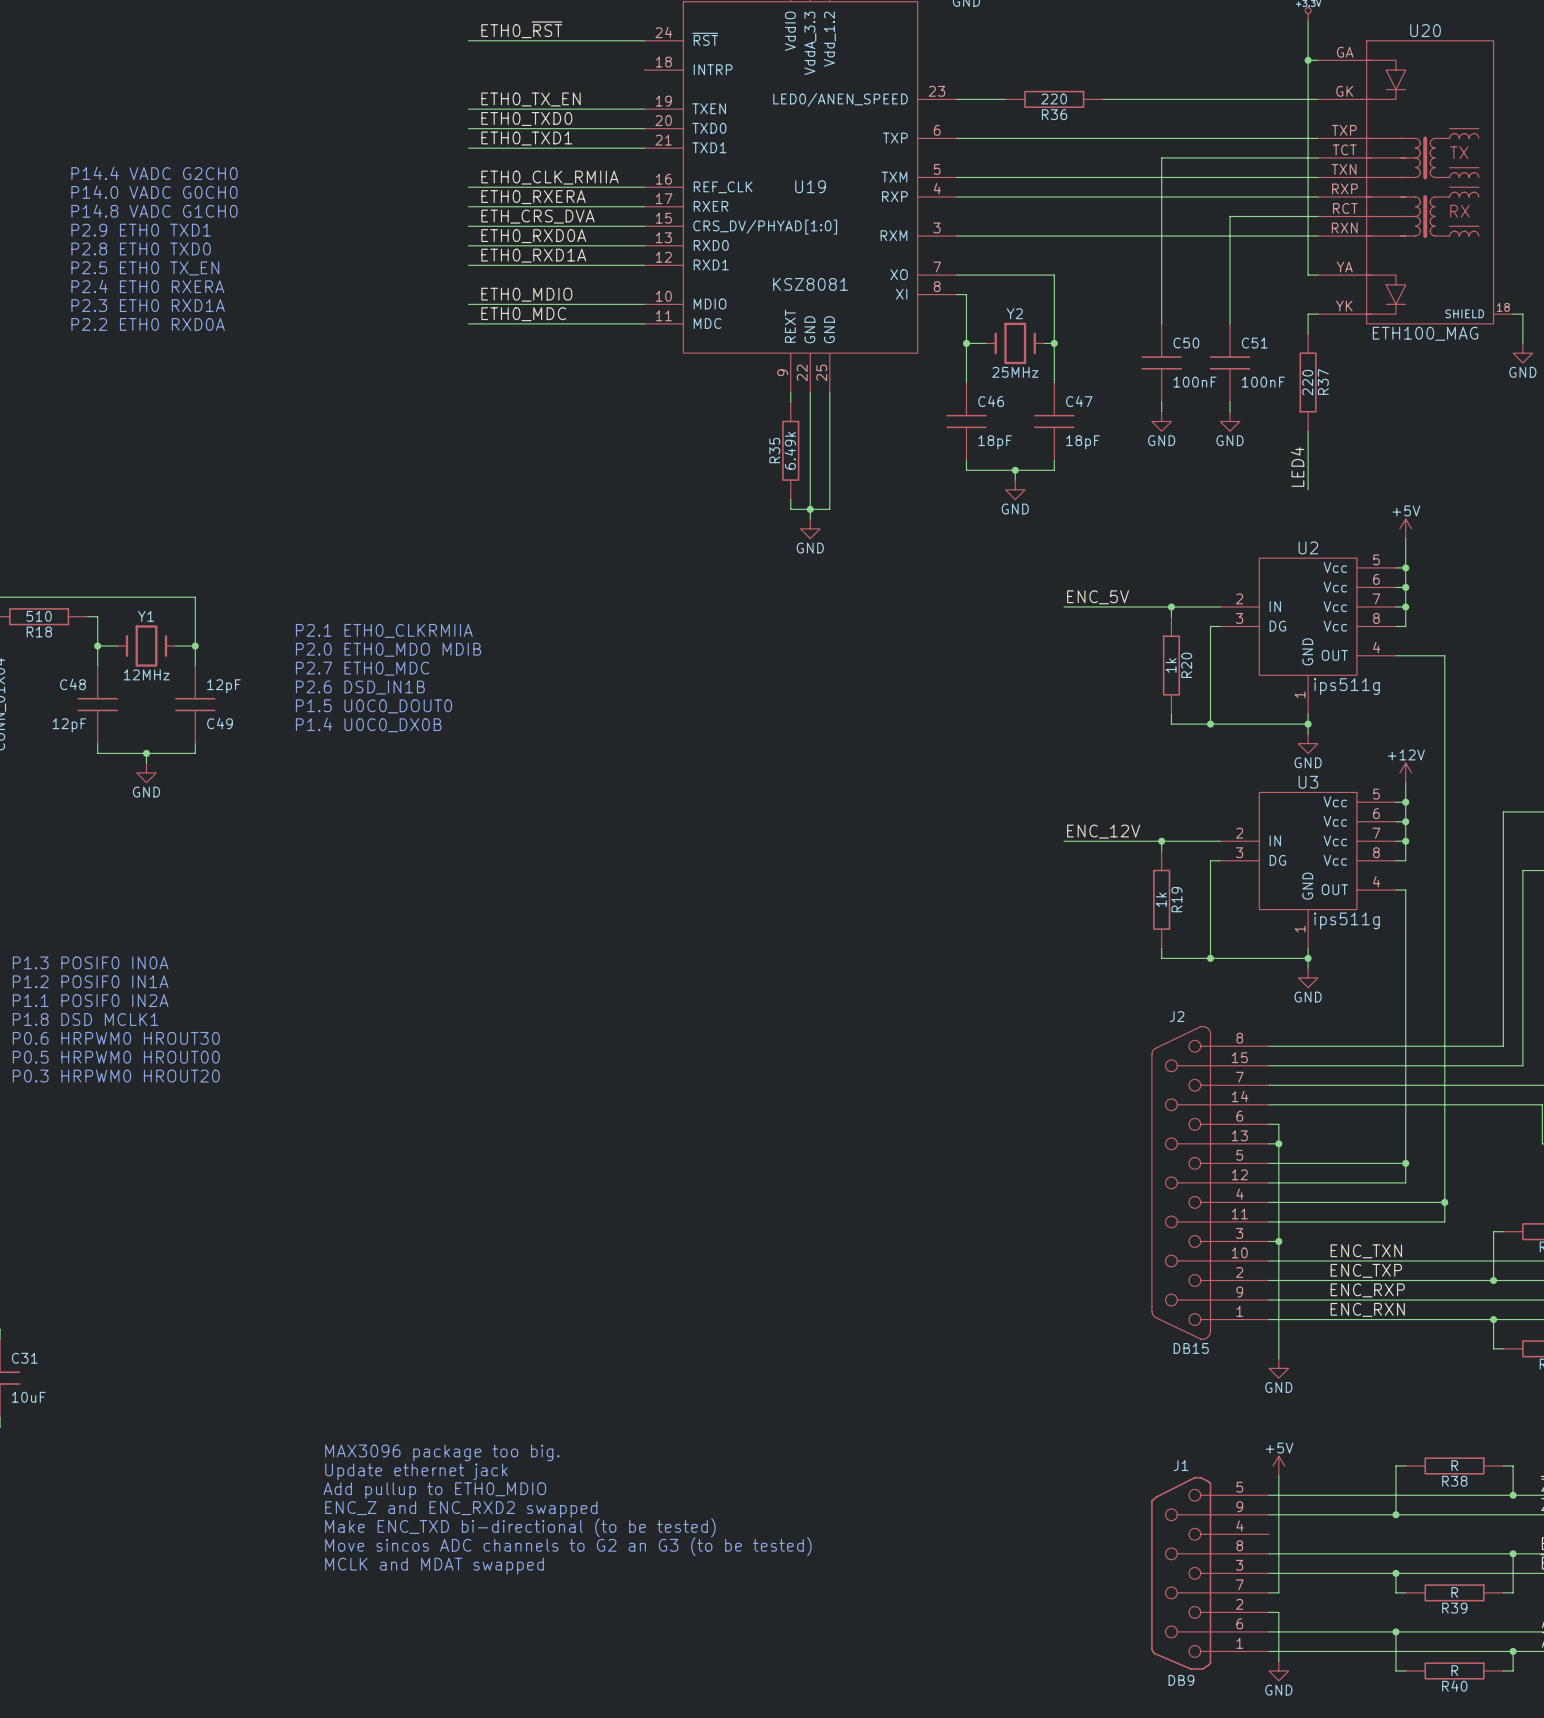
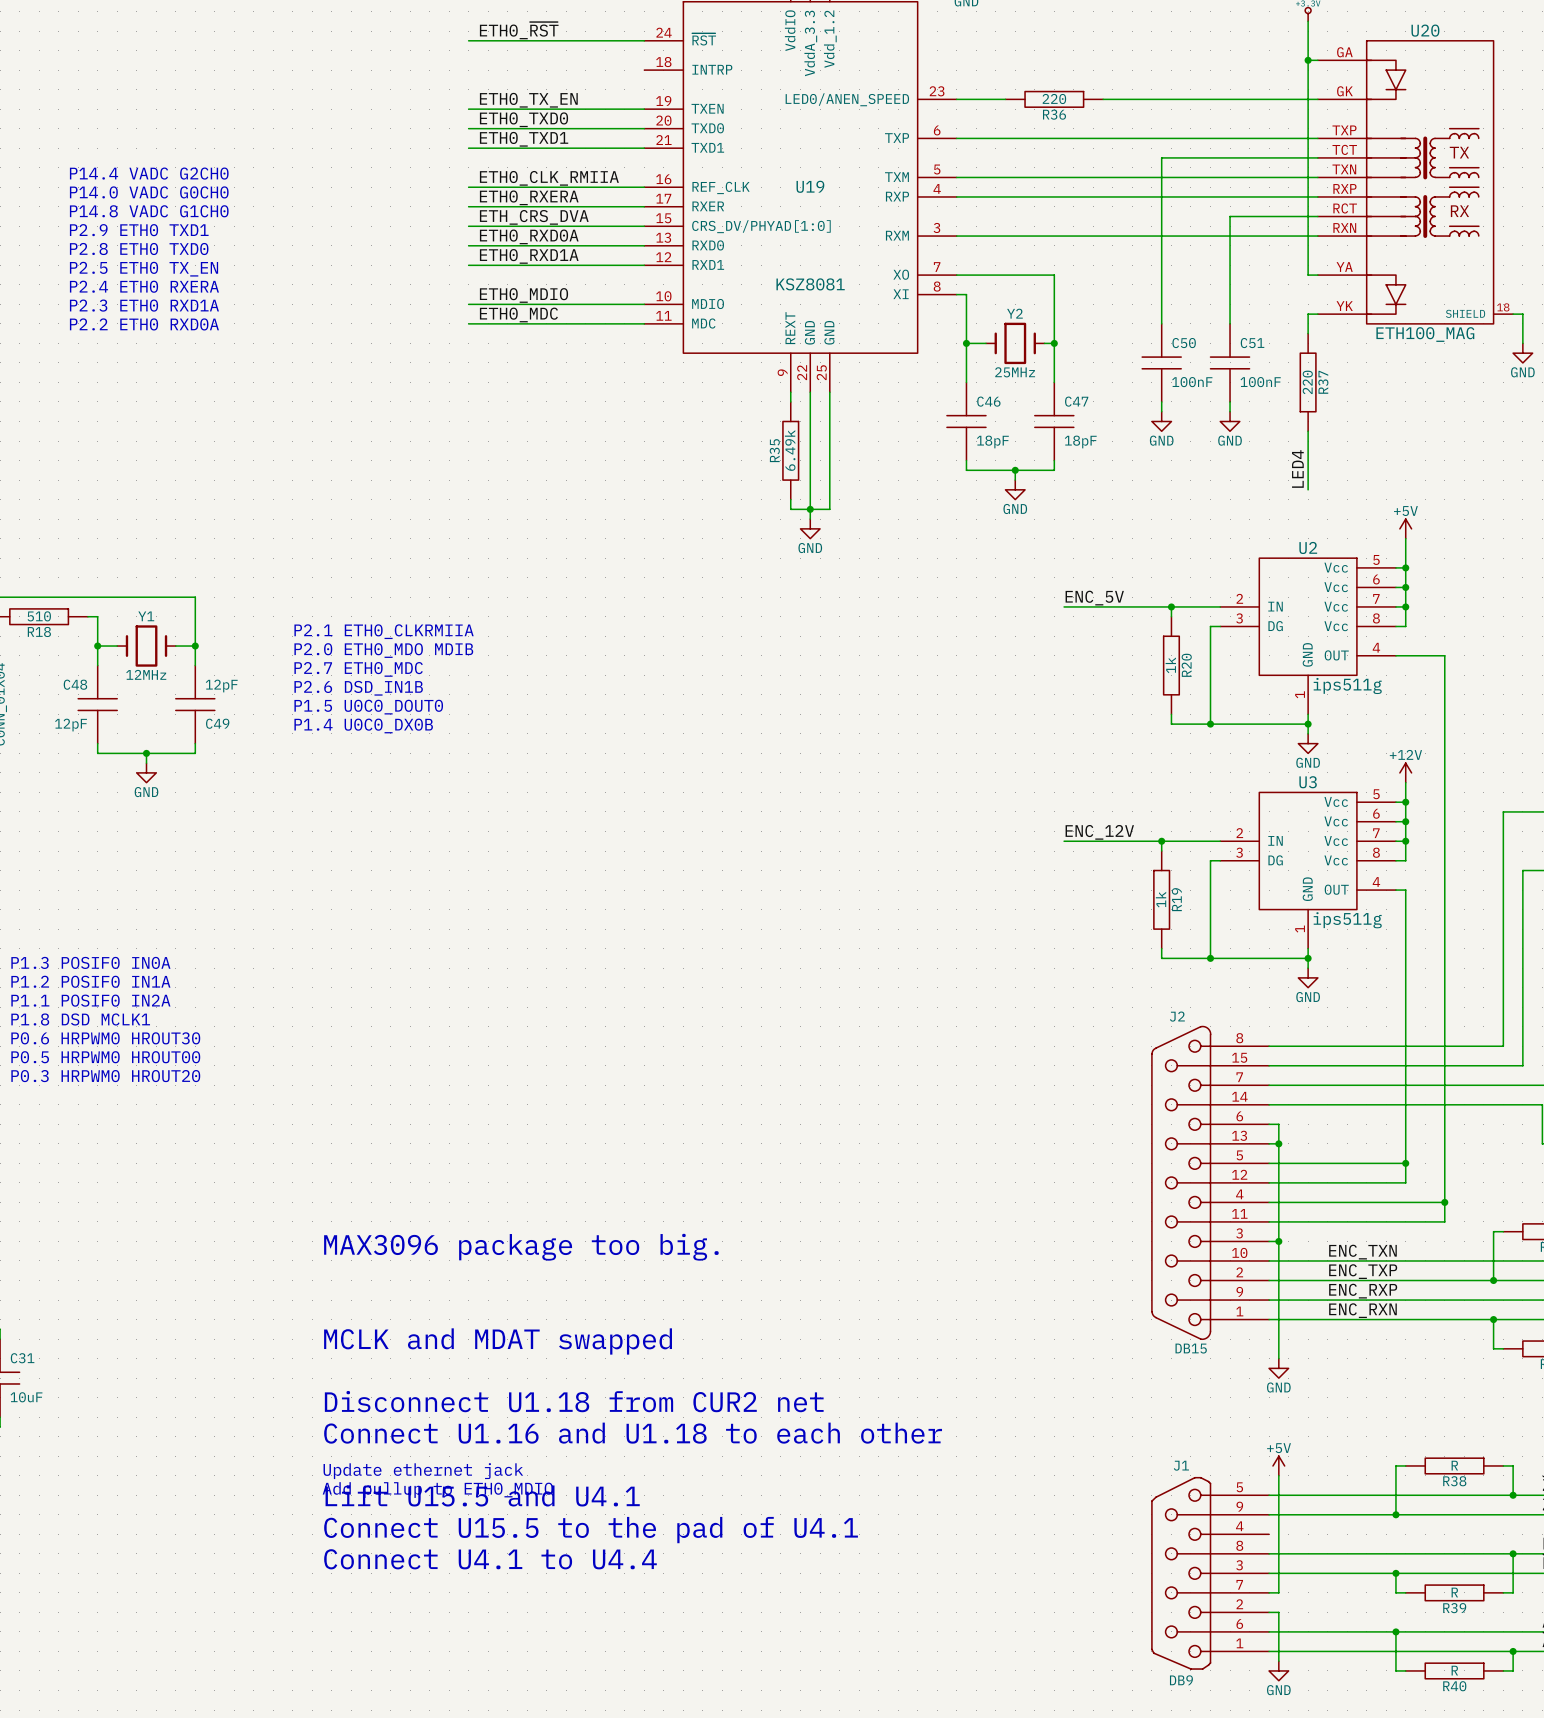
text: none -> MAX3096 package too big. (521, 1247)
text: none -> MCLK and MDAT swapped (498, 1341)
text: none -> Disconnect U1.18 from CUR2 net (574, 1401)
text: none -> Connect U1.16 and U1.18 to each other (633, 1433)
text: MAX3096 package too big. (442, 1452) -> none
text: ENC_Z and ENC_RXD2 swapped (461, 1509) -> Lift U15.5 and U4.1 (482, 1495)
text: Make ENC_TXD bi-directional (to be tested) (520, 1527) -> none
text: none -> Connect U15.5 to the pad of U4.1 (591, 1530)
text: Move sincos ADC channels to G2 an G3 (to be tested) (568, 1546) -> none
text: MCLK and MDAT swapped (434, 1566) -> Connect U4.1 to U4.4 (490, 1559)

